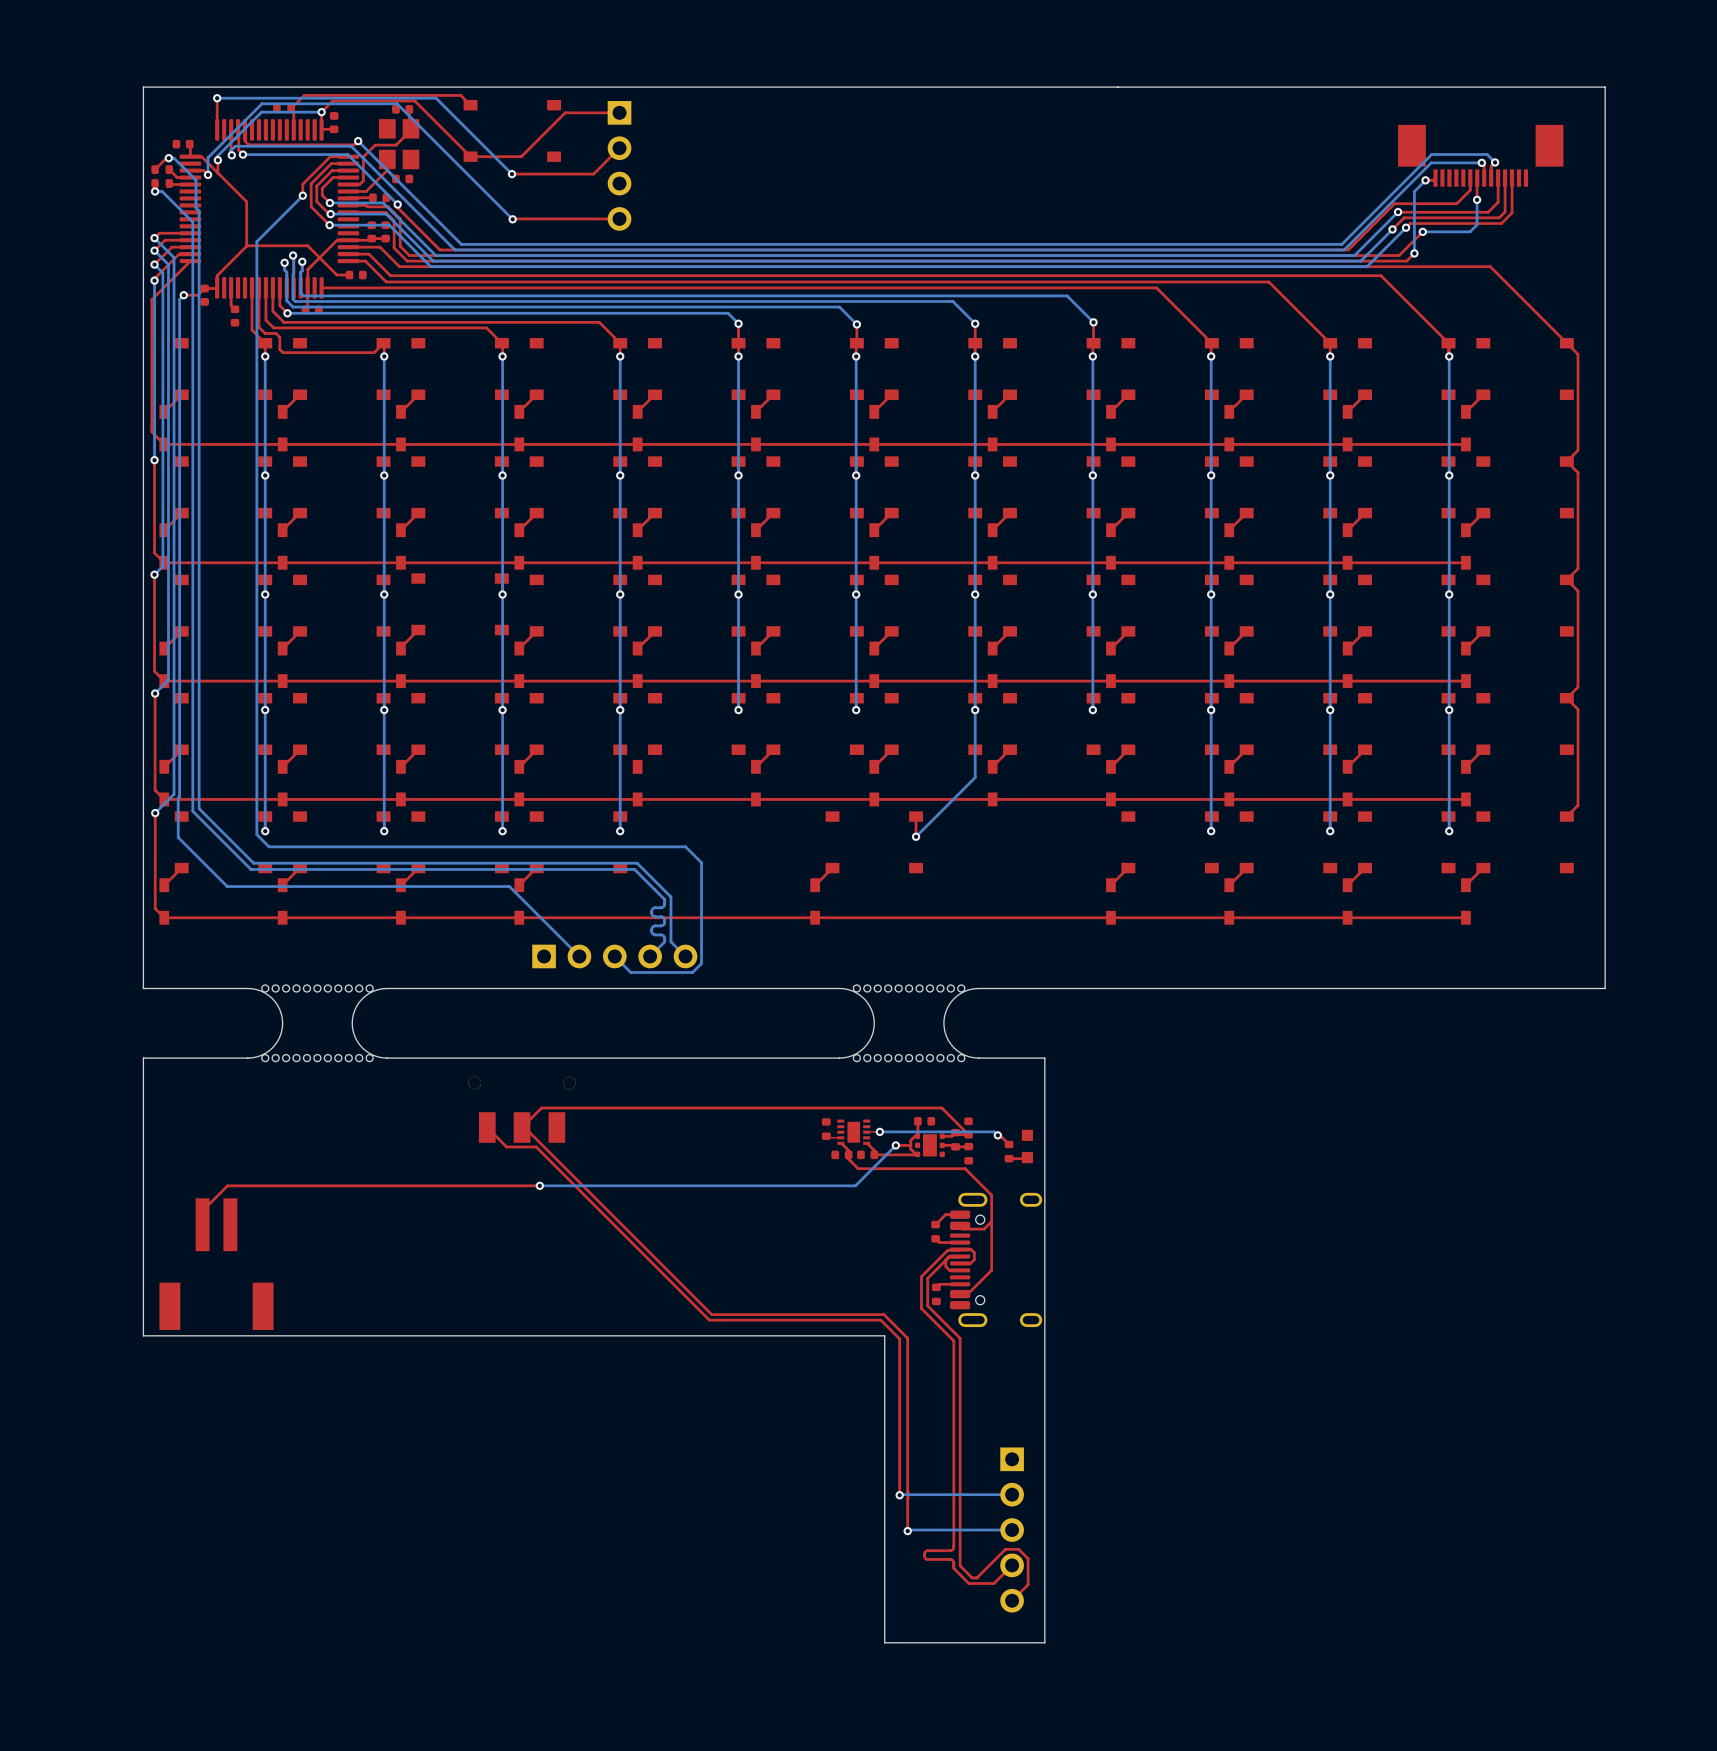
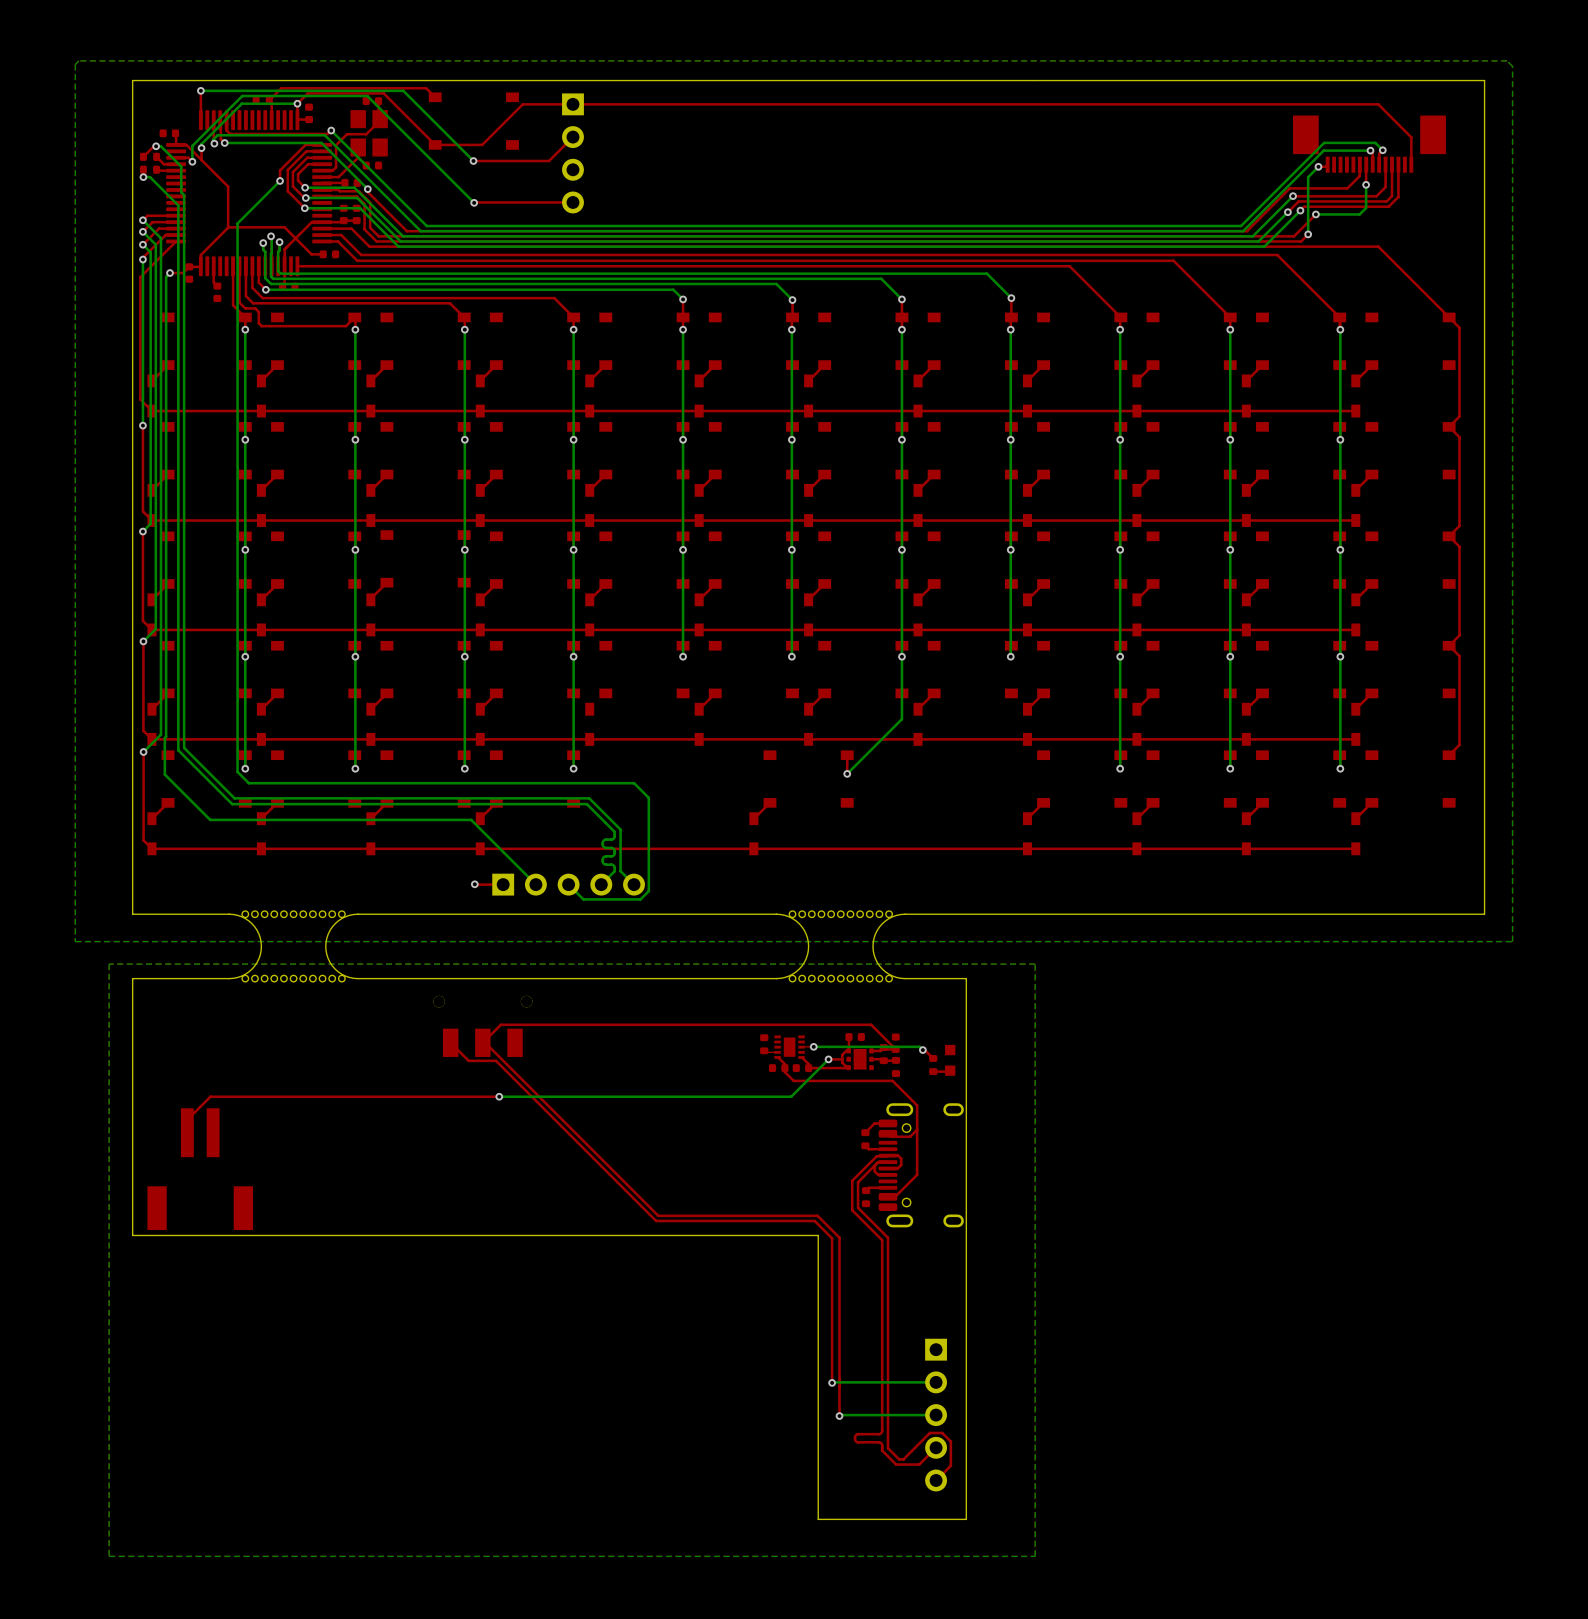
bottom zone outline: none -> (1507, 60) (78, 60) (75, 64) (75, 941) (1512, 941) (1512, 66) (1507, 60)
top track: none -> (572, 104) (1378, 104) (1411, 137) (1411, 164)
top track: none -> (474, 884) (503, 884)
via: none -> (474, 884)
bottom zone outline: none -> (1035, 964) (109, 964) (109, 1556) (1035, 1556) (1035, 964)

